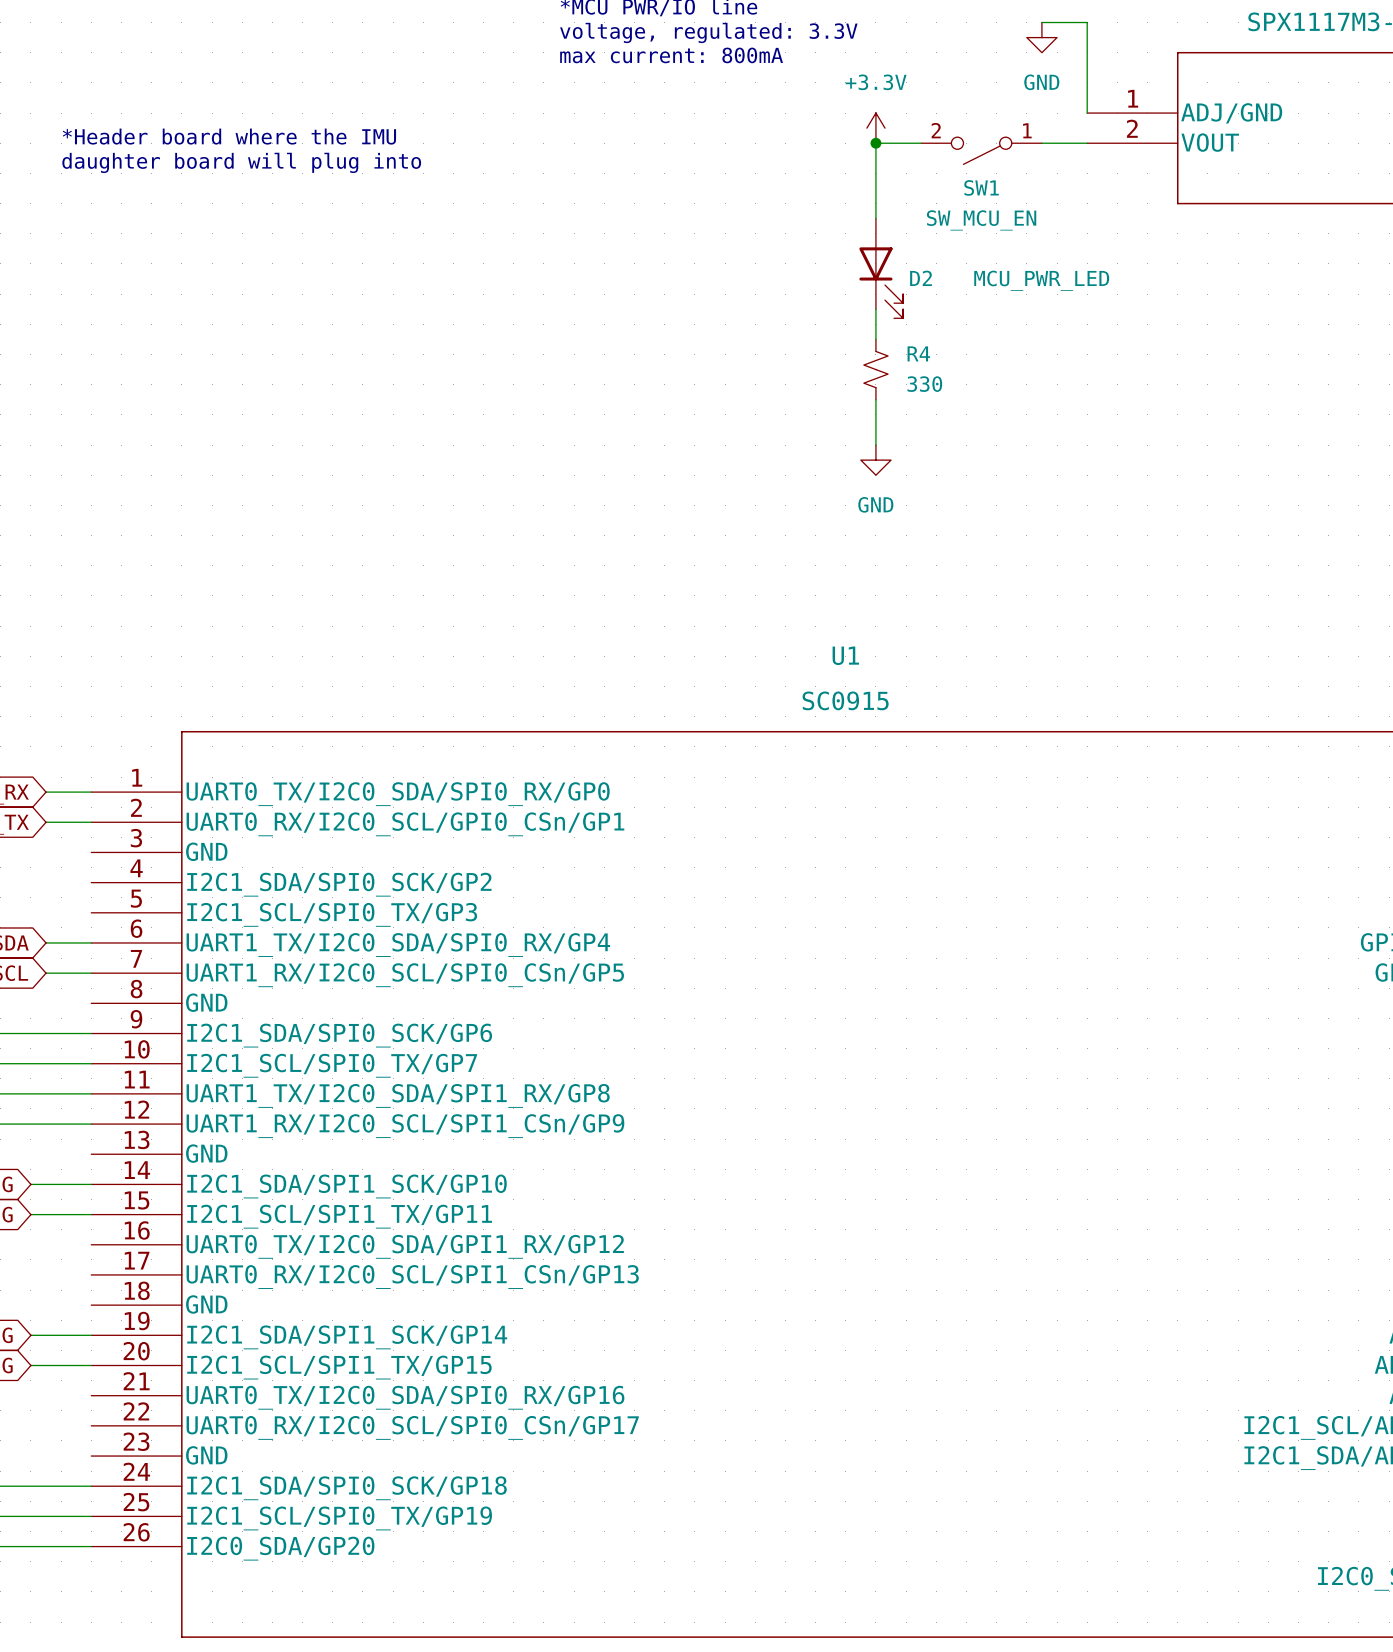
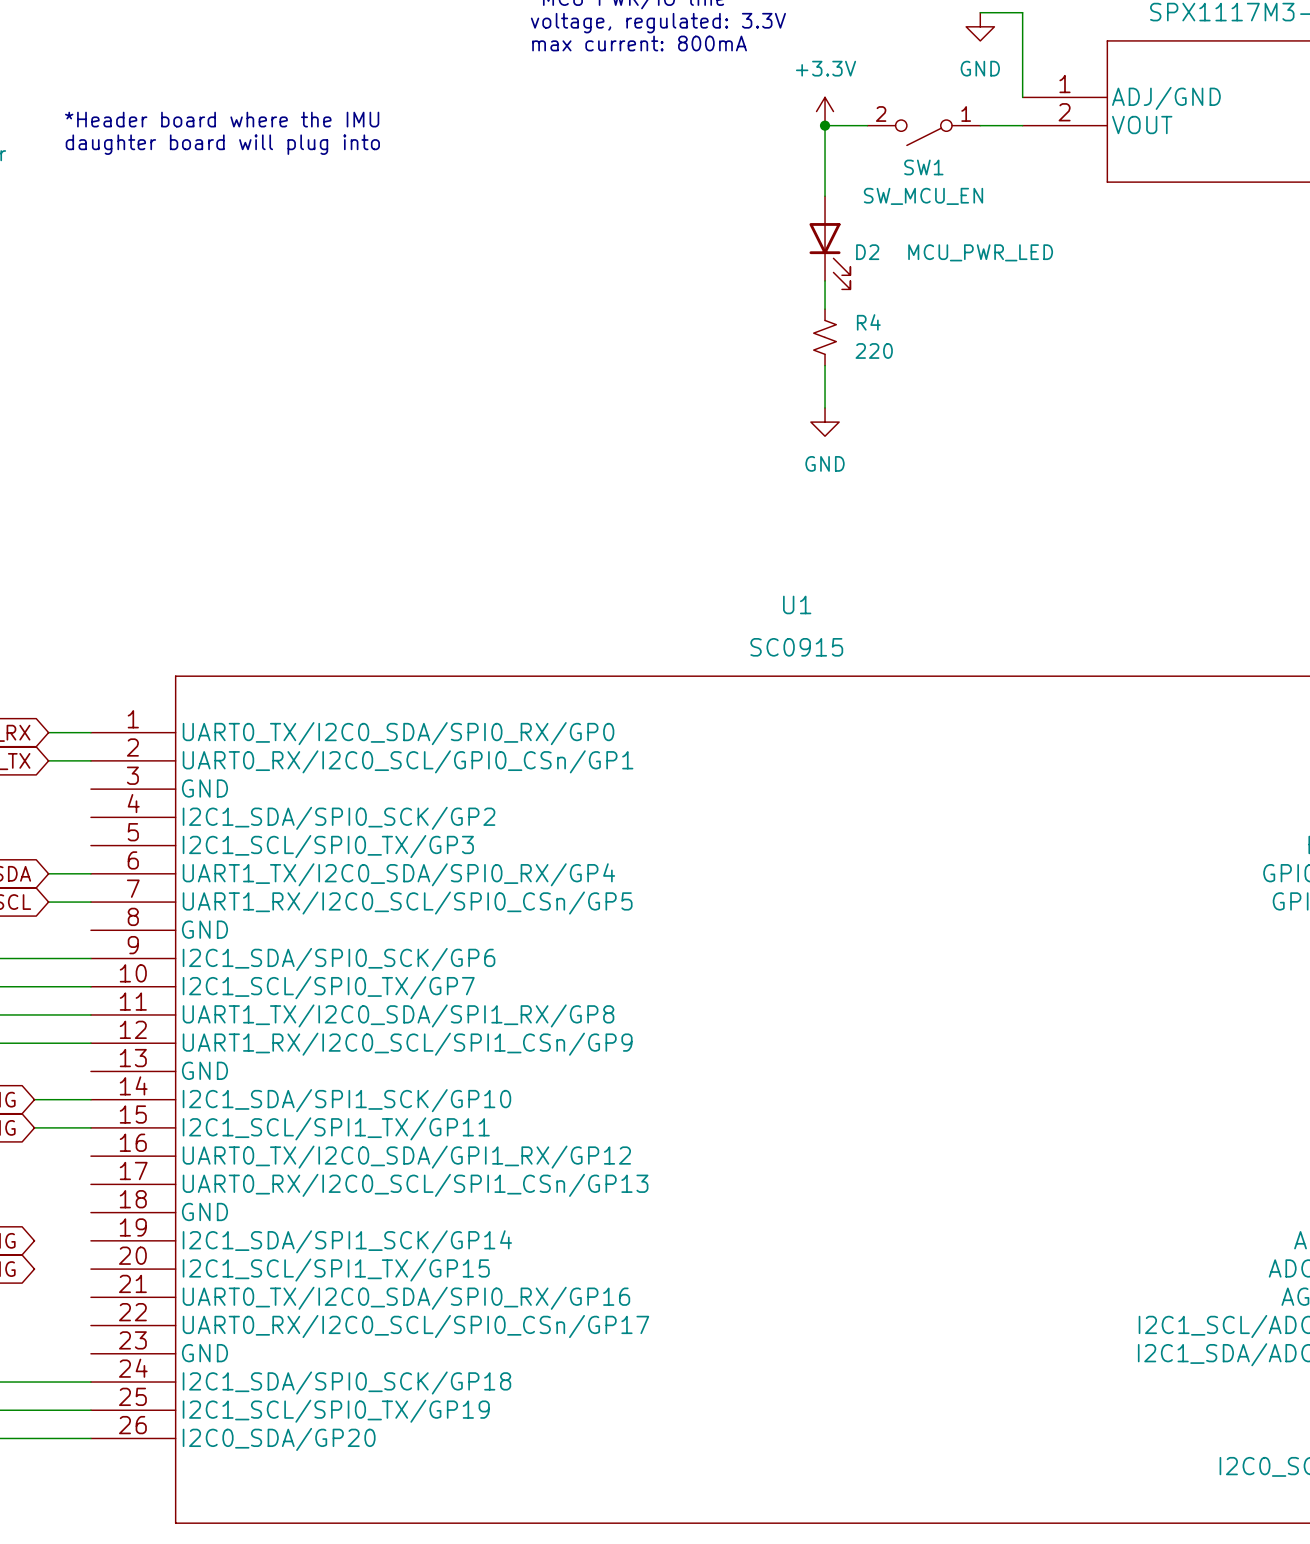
R4 value: 330 (924, 384) -> 220 (874, 350)
wire: (30, 1335) (91, 1335) -> none
wire: (30, 1365) (91, 1365) -> none

